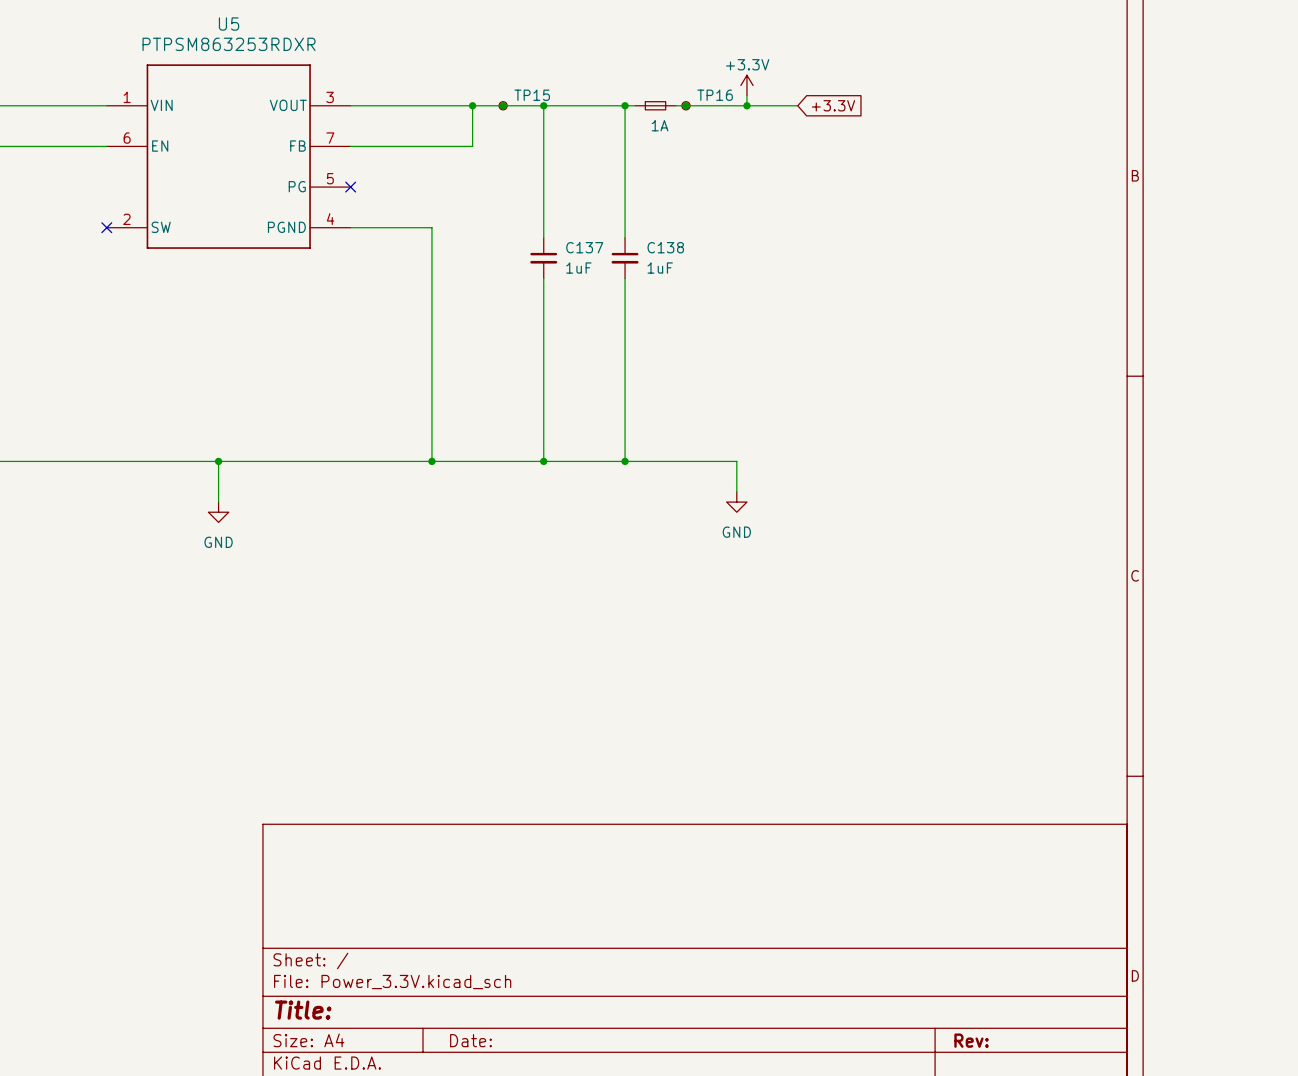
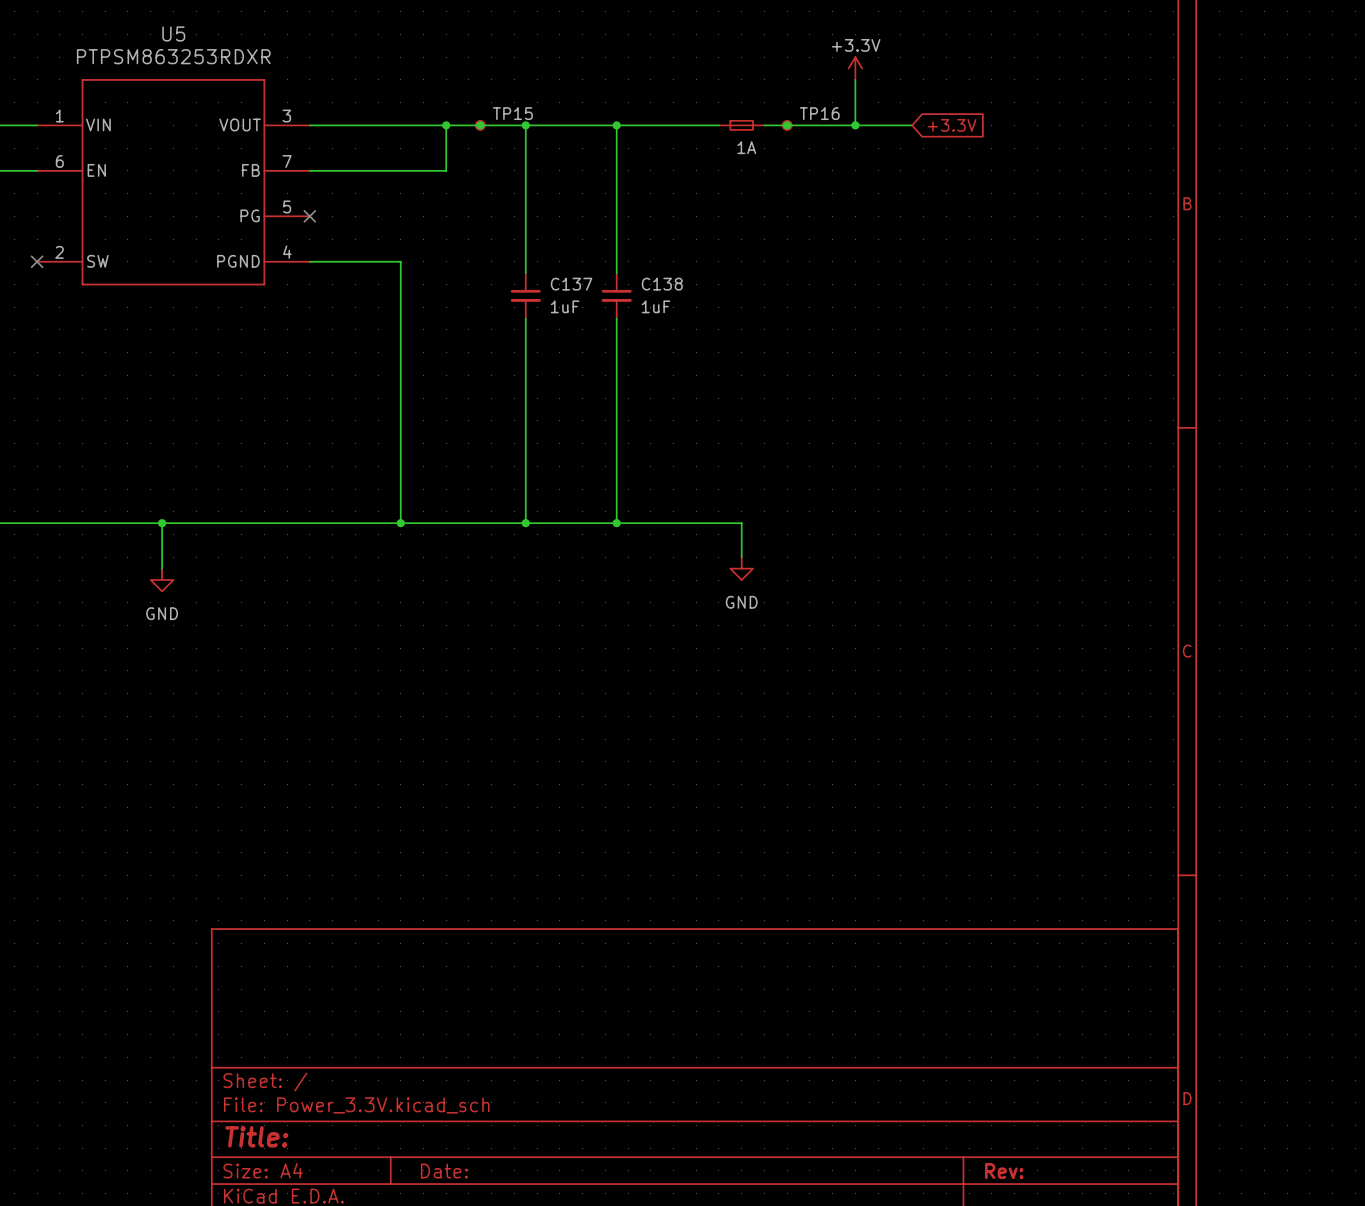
wire: none -> (855, 79) (855, 125)
power symbol position: +3.3V (746, 85) -> +3.3V (855, 68)
wire: (746, 95) (746, 105) -> none
part position: (655, 105) -> (741, 125)
junction: (686, 105) -> none
TP16 position: (686, 105) -> (787, 125)
junction position: (746, 105) -> (787, 125)
wire: none -> (809, 125) (912, 125)
global label position: +3.3V (833, 105) -> +3.3V (952, 125)
junction: none -> (855, 125)

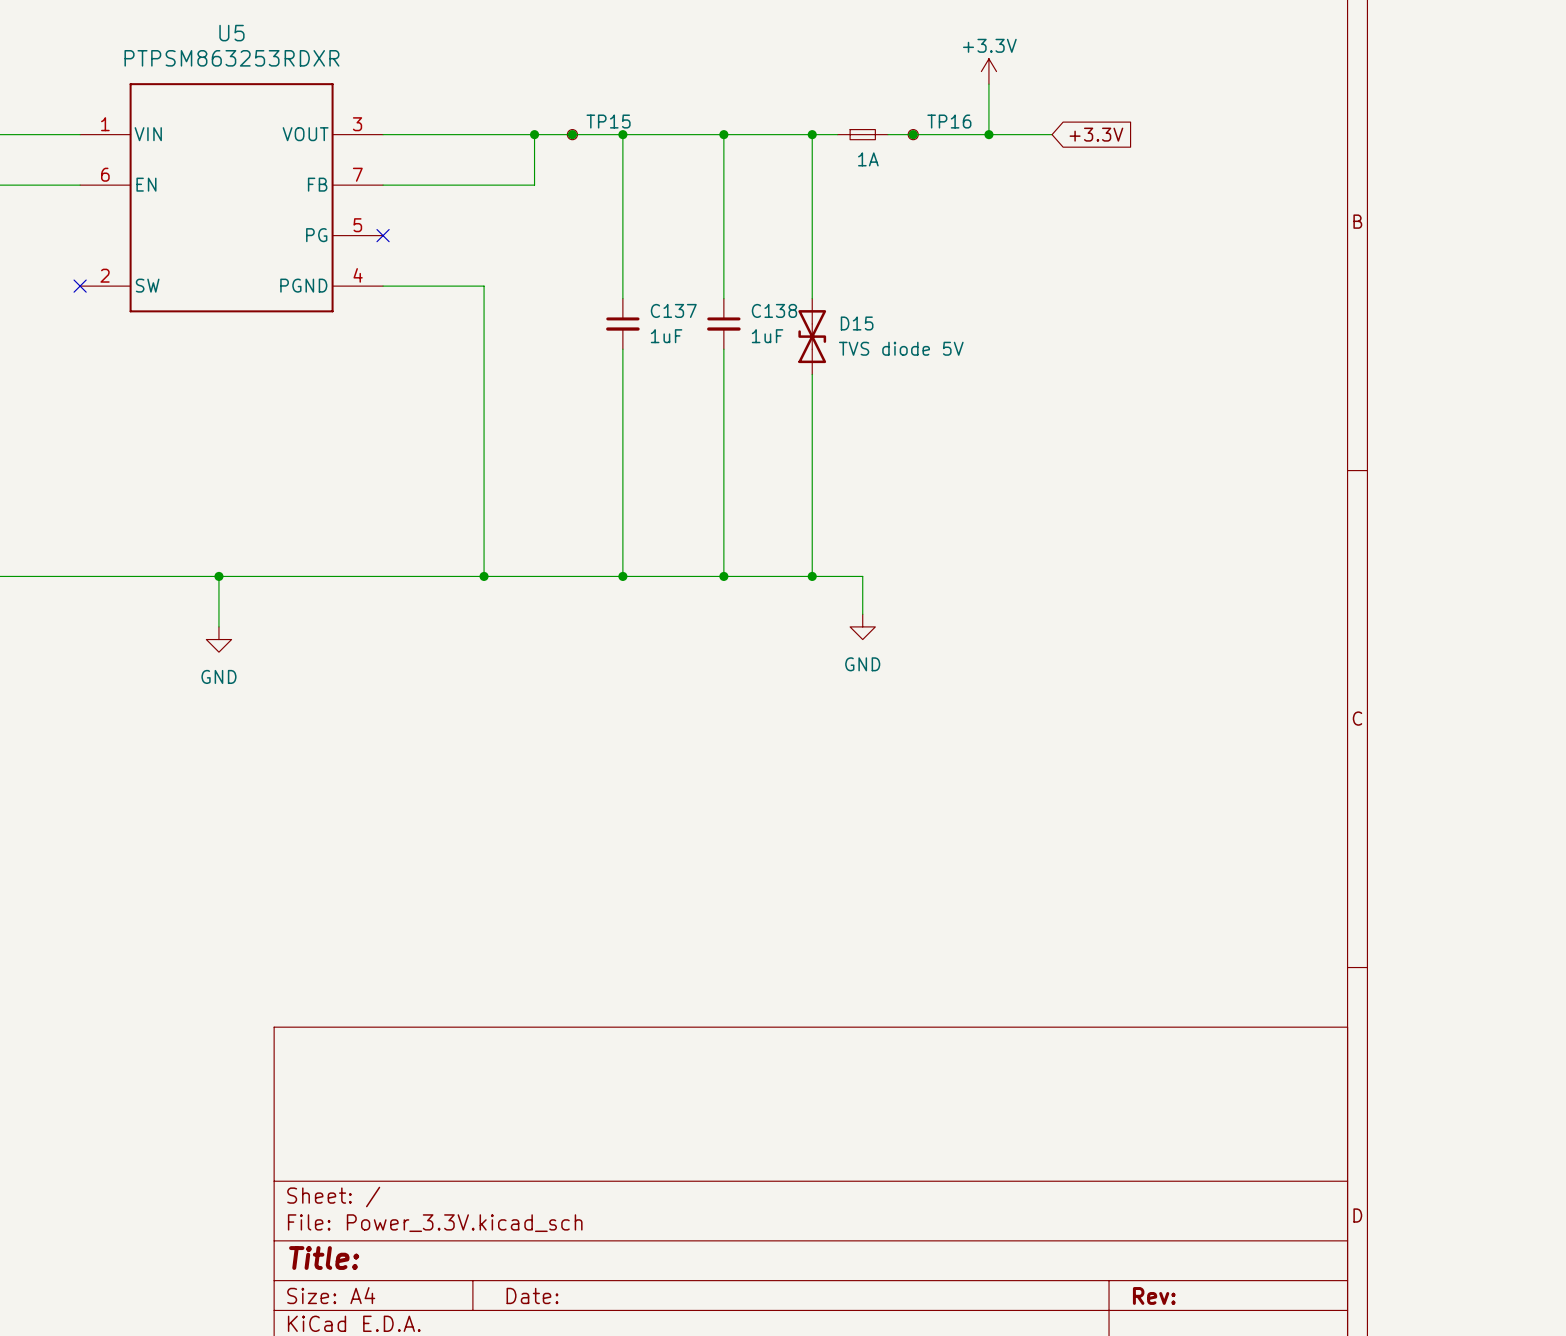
wire: none -> (812, 134) (812, 298)
junction: none -> (812, 134)
D15: none -> TVS diode 5V (812, 336)
wire: none -> (812, 374) (812, 576)
junction: none -> (812, 576)

